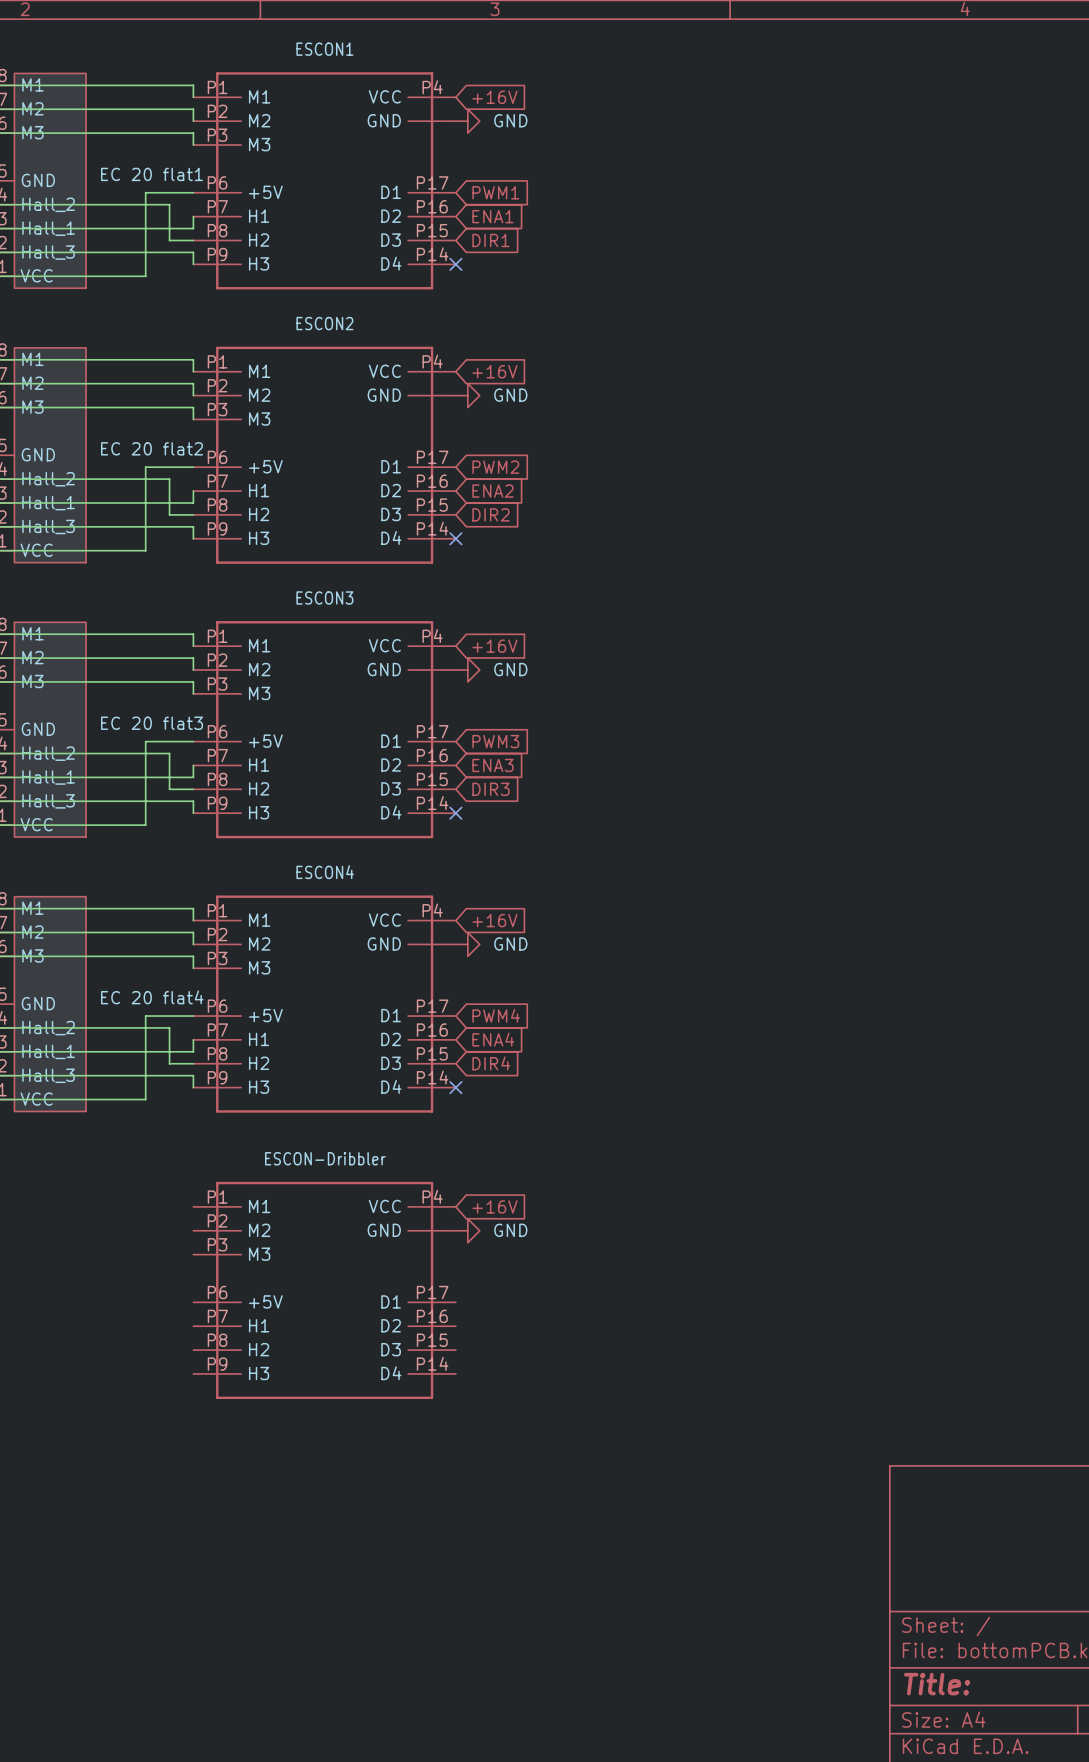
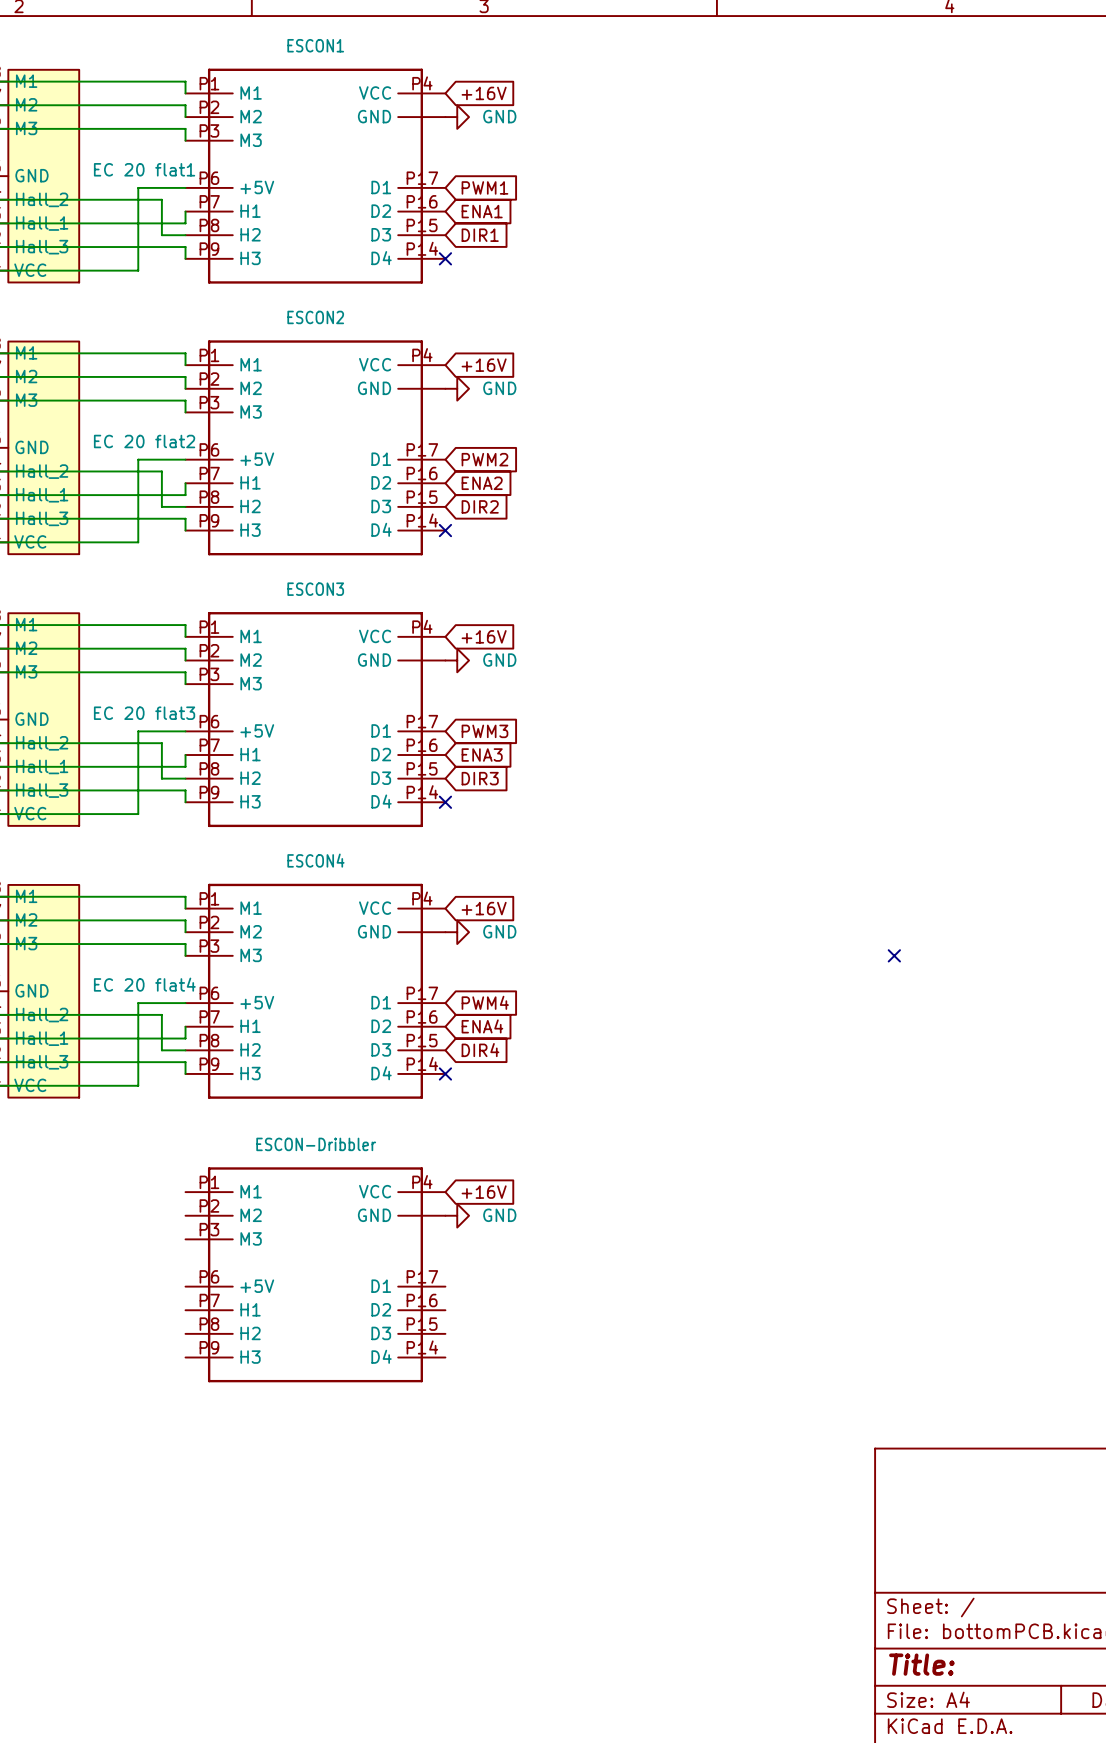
no-connect mark: none -> (894, 955)

